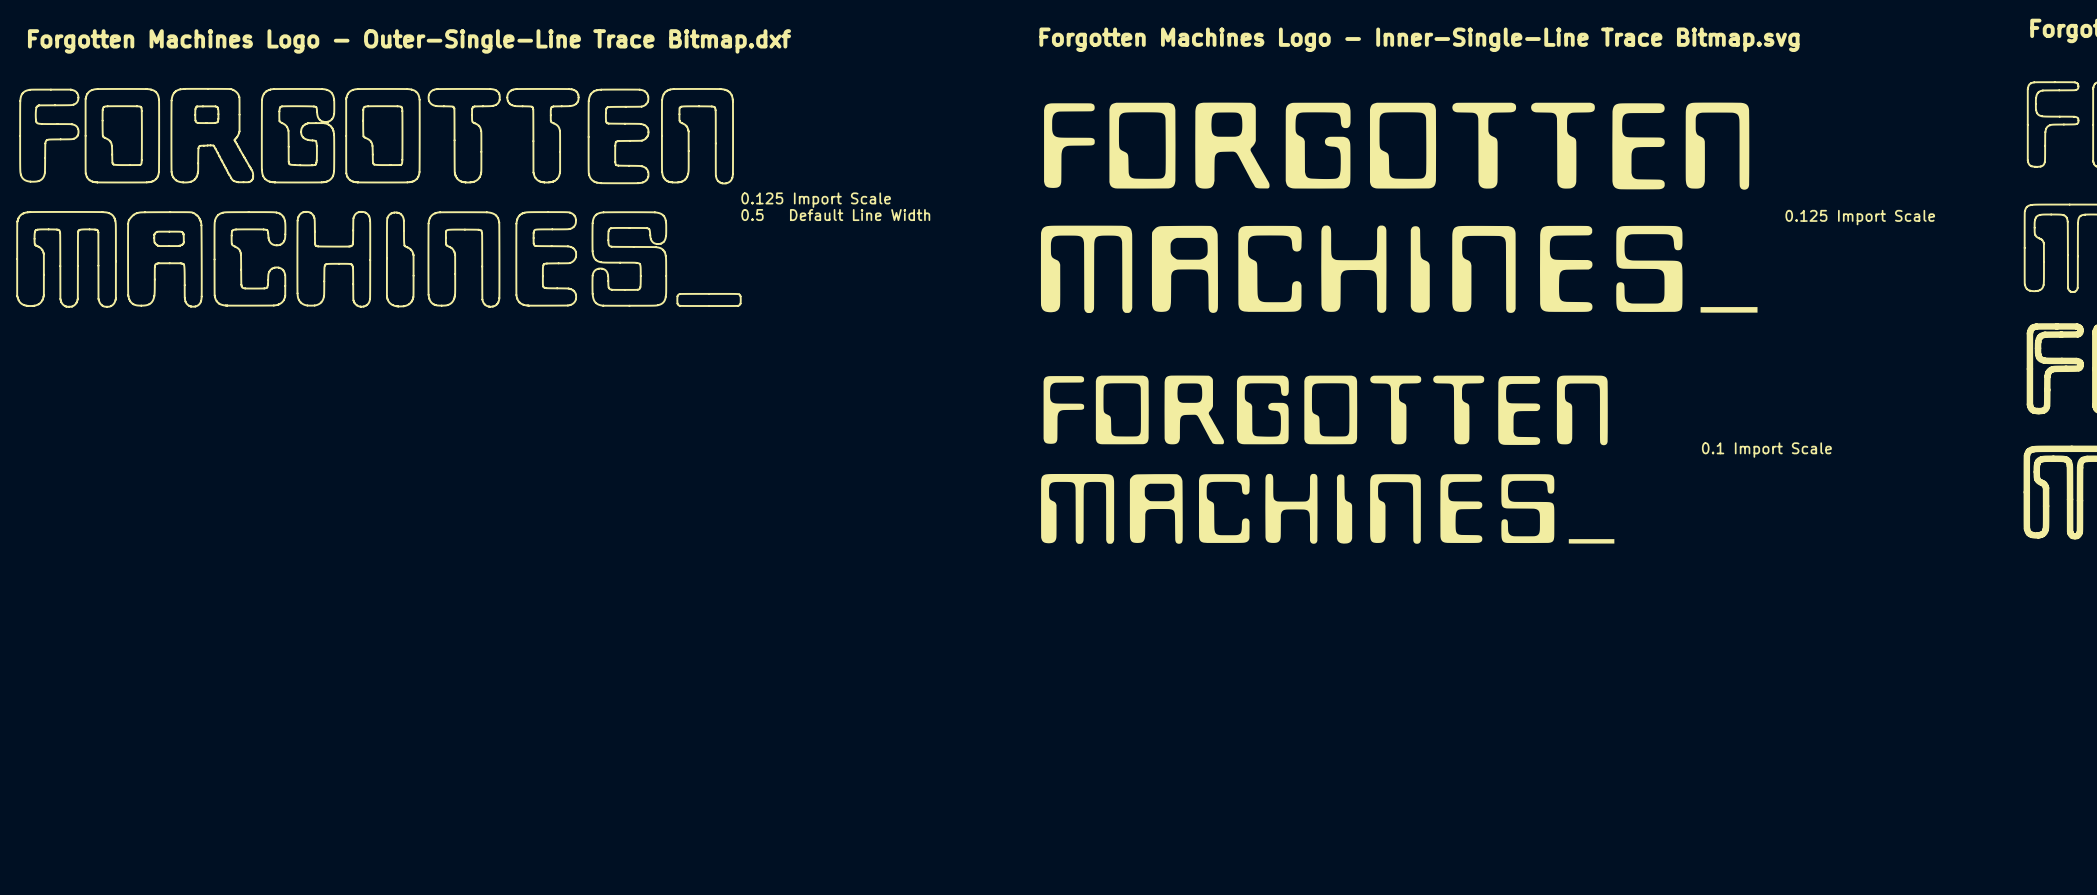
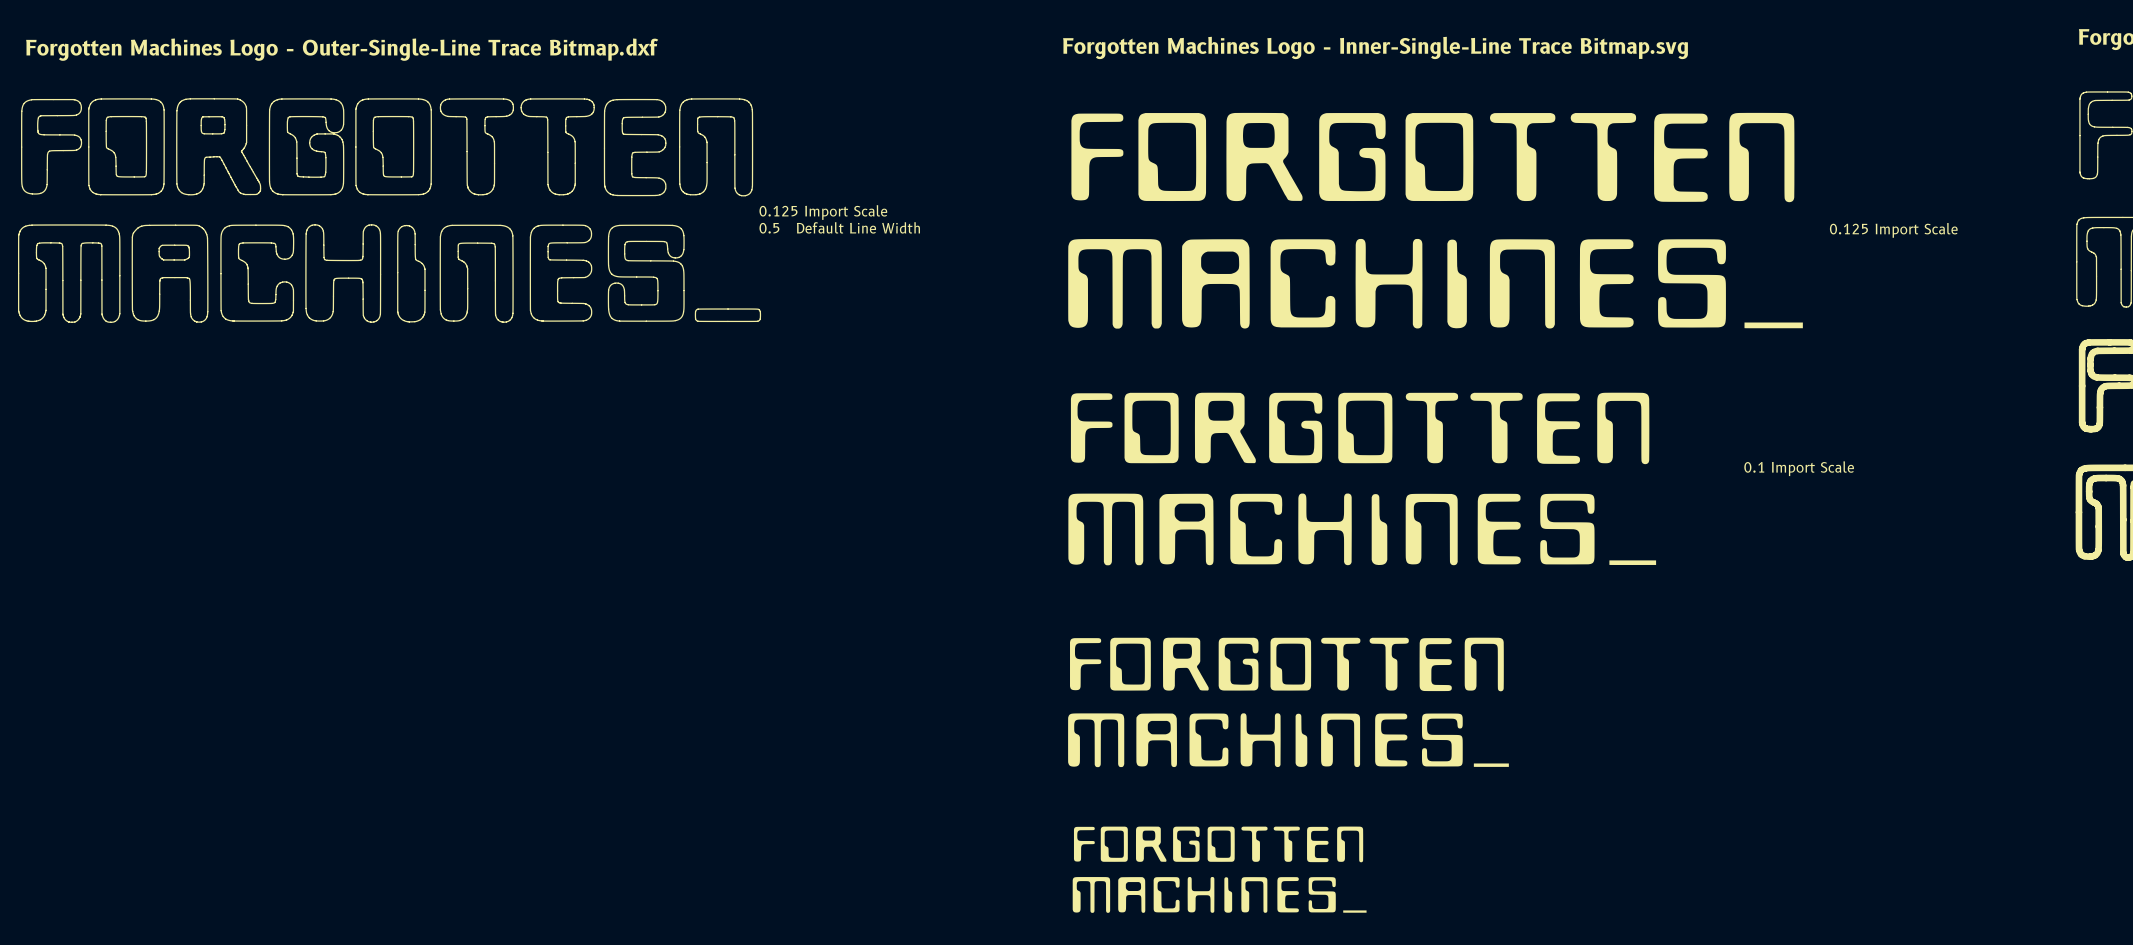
drawing: none -> [1070, 637, 1452, 692]
drawing: none -> [1464, 637, 1504, 692]
drawing: none -> [1068, 713, 1281, 768]
drawing: none -> [1295, 713, 1308, 767]
drawing: none -> [1321, 713, 1361, 768]
drawing: none -> [1375, 713, 1408, 767]
drawing: none -> [1421, 713, 1509, 767]
drawing: none -> [1073, 826, 1364, 863]
drawing: none -> [1072, 876, 1367, 913]

